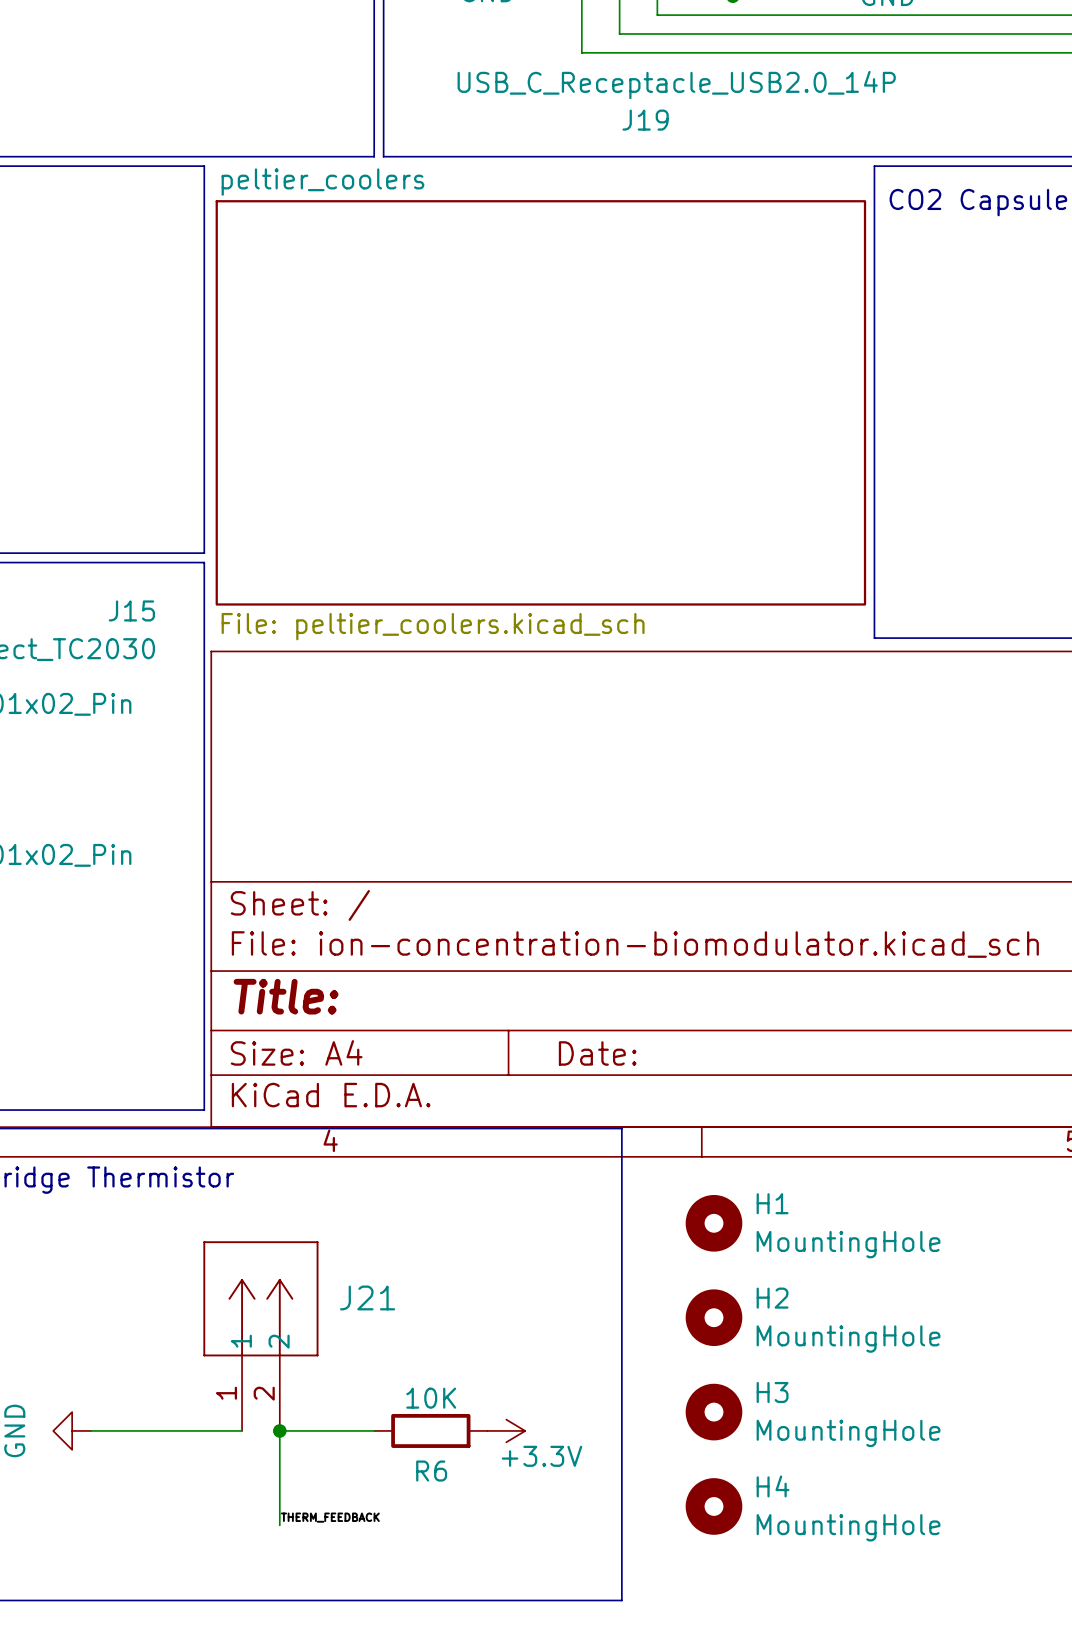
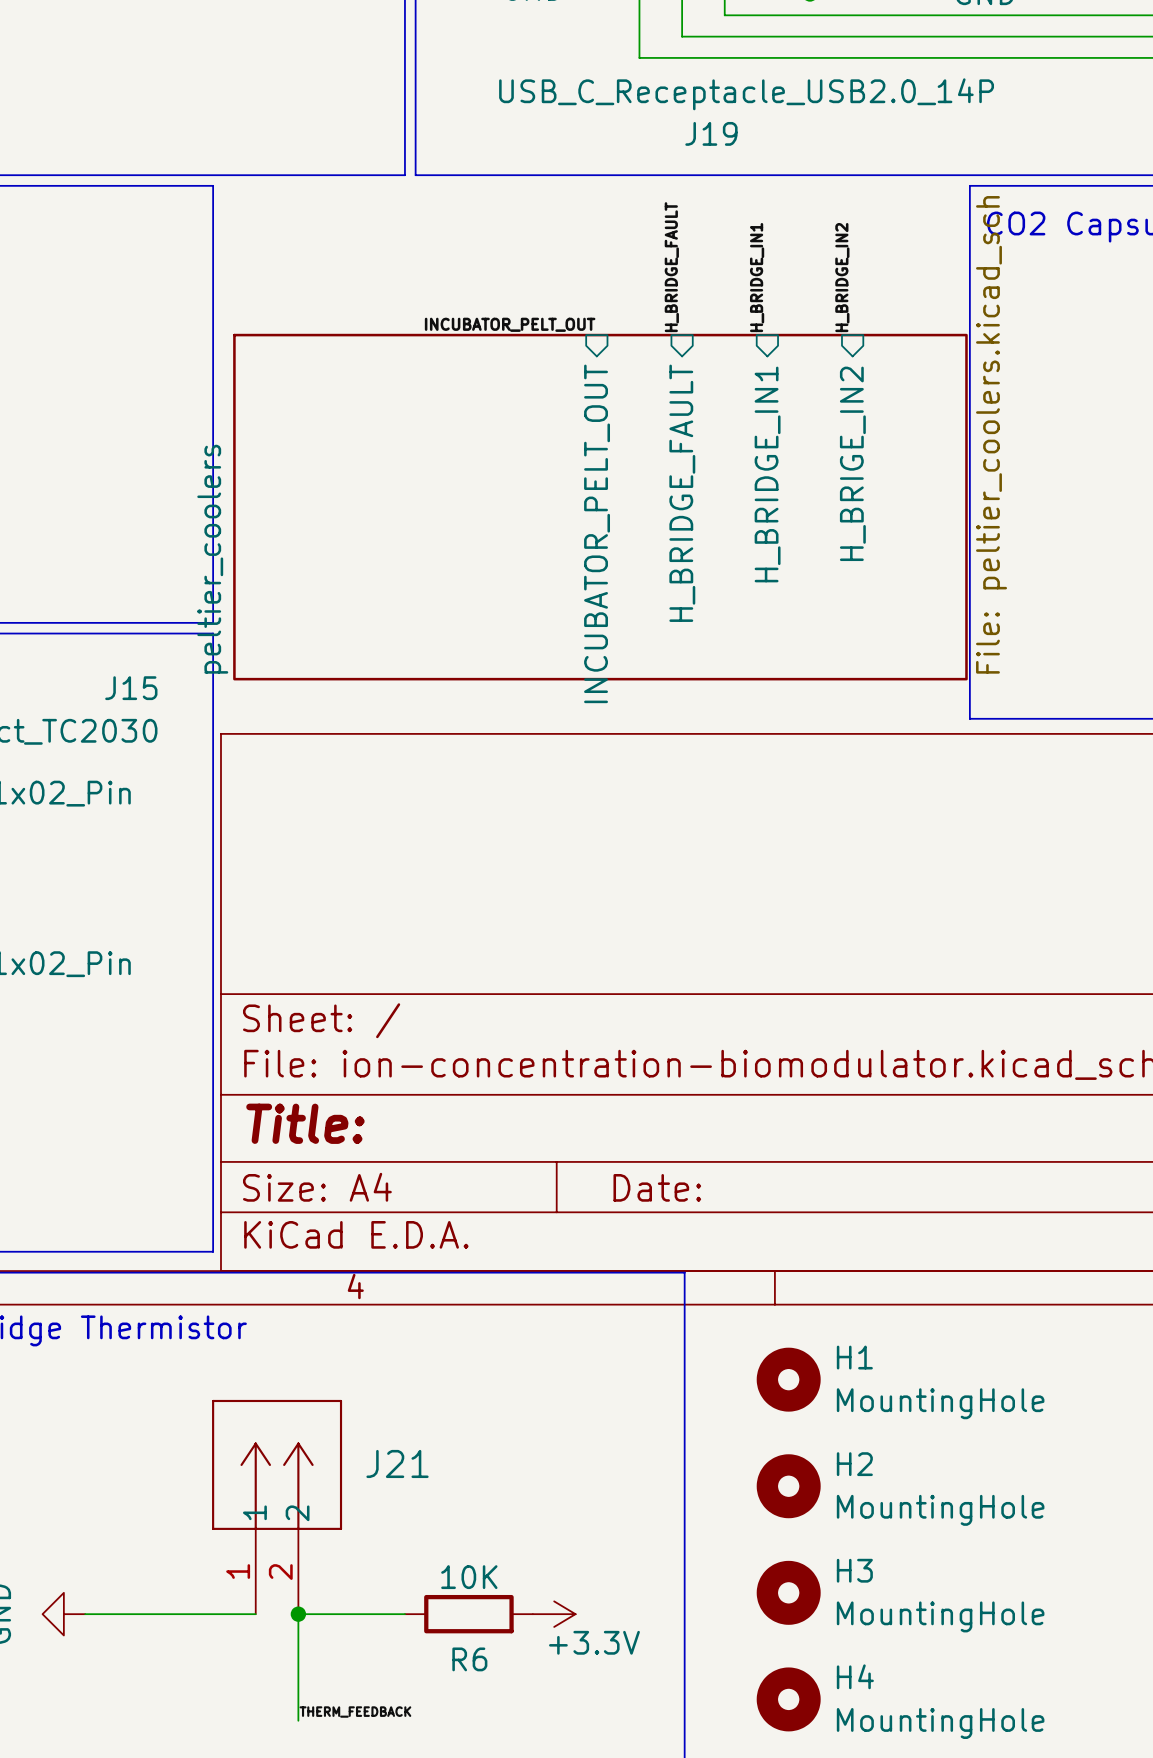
label: none -> H_BRIDGE_FAULT (671, 267)
label: none -> H_BRIDGE_IN1 (757, 277)
label: none -> H_BRIDGE_IN2 (842, 277)
label: none -> INCUBATOR_PELT_OUT (510, 324)
sheet peltier_coolers: File: peltier_coolers.kicad_sch (540, 402) -> none
sheet pin: none -> H_BRIGE_IN2 (852, 463)
sheet pin: none -> H_BRIDGE_IN1 (767, 474)
sheet pin: none -> H_BRIDGE_FAULT (682, 493)
sheet peltier_coolers: none -> File: peltier_coolers.kicad_sch (600, 507)
sheet pin: none -> INCUBATOR_PELT_OUT (597, 533)

